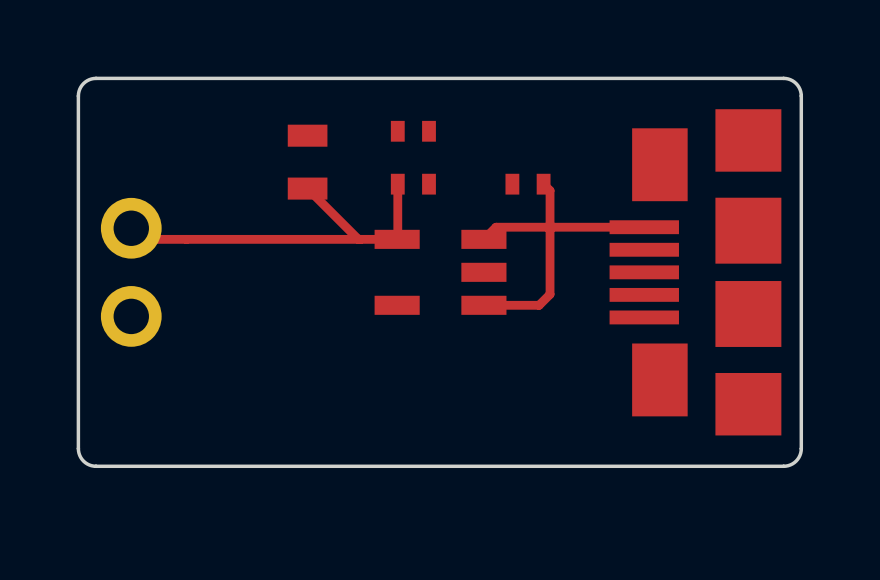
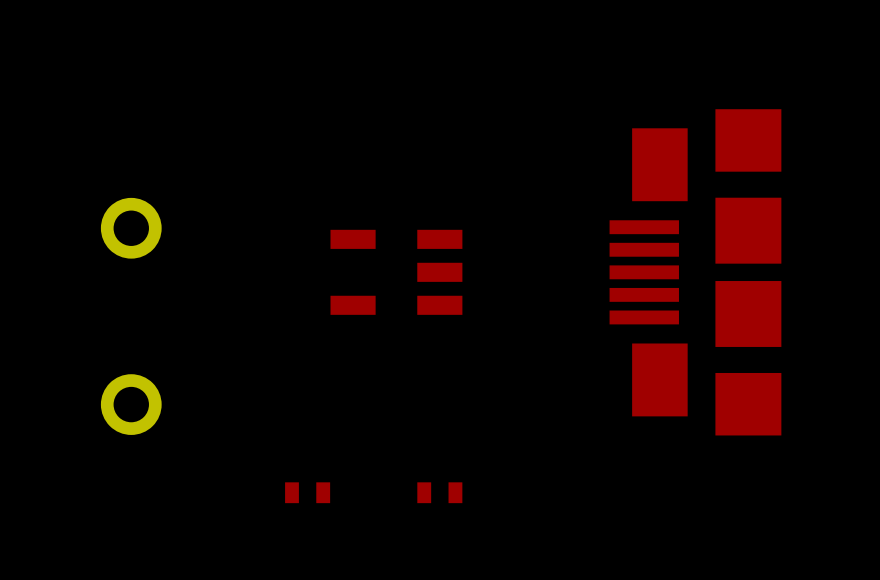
board edge: (783, 78) (96, 78) (87, 80) (80, 87) (78, 96) (78, 448) (80, 457) (87, 463) (96, 466) (783, 466) (792, 463) (798, 457) (801, 448) (801, 96) (796, 83) (783, 78) -> none
part: (413, 131) -> none
part: (307, 162) -> none
top track: (397, 184) (397, 239) (142, 239) (131, 228) -> none
part: (413, 184) -> none
part: (528, 184) -> none
top track: (543, 184) (550, 190) (550, 294) (539, 305) (483, 305) -> none
top track: (307, 188) (358, 239) -> none
top track: (644, 227) (496, 227) (483, 239) -> none
part position: (440, 272) -> (396, 272)
part position: (131, 316) -> (131, 404)
part: none -> (307, 492)
part: none -> (439, 492)

